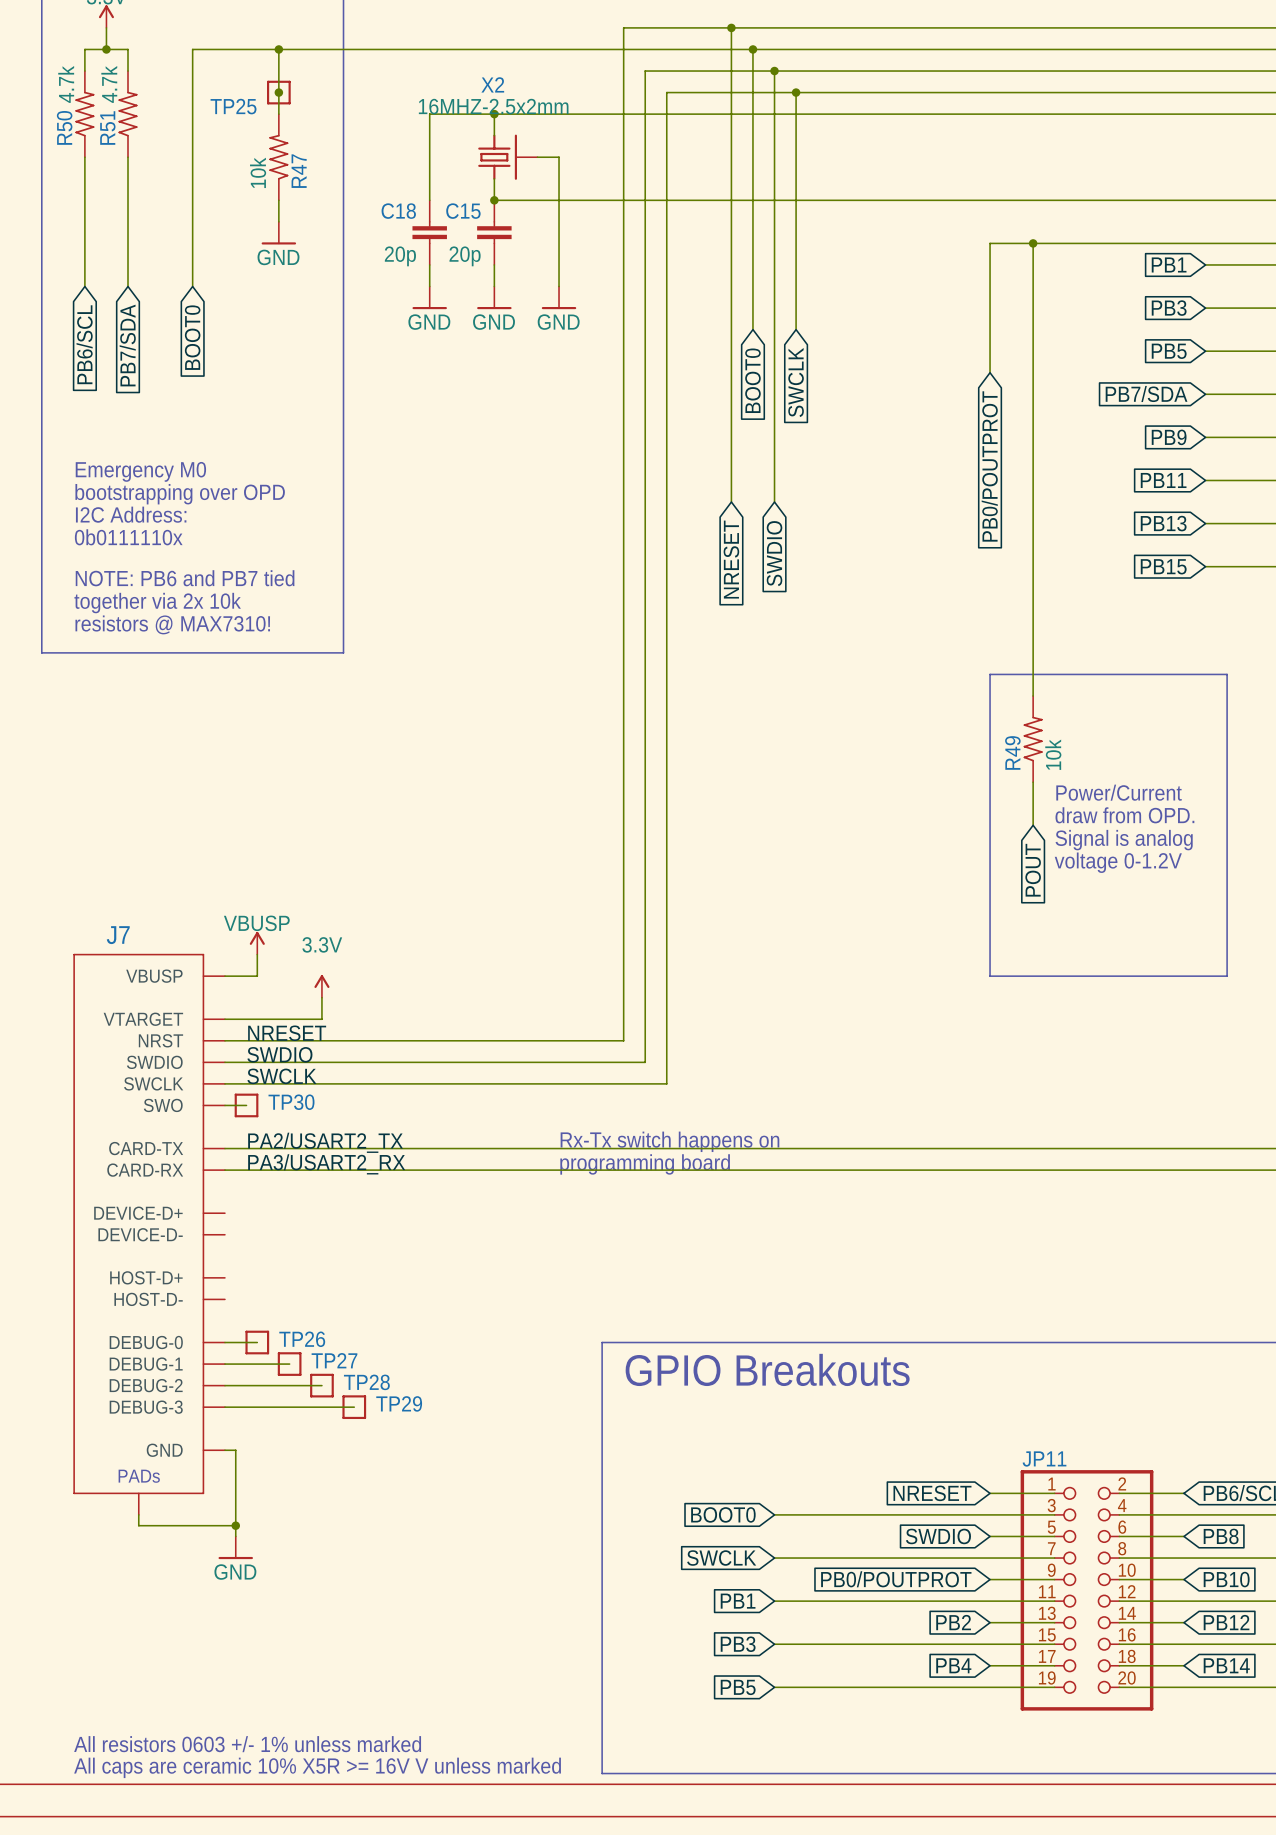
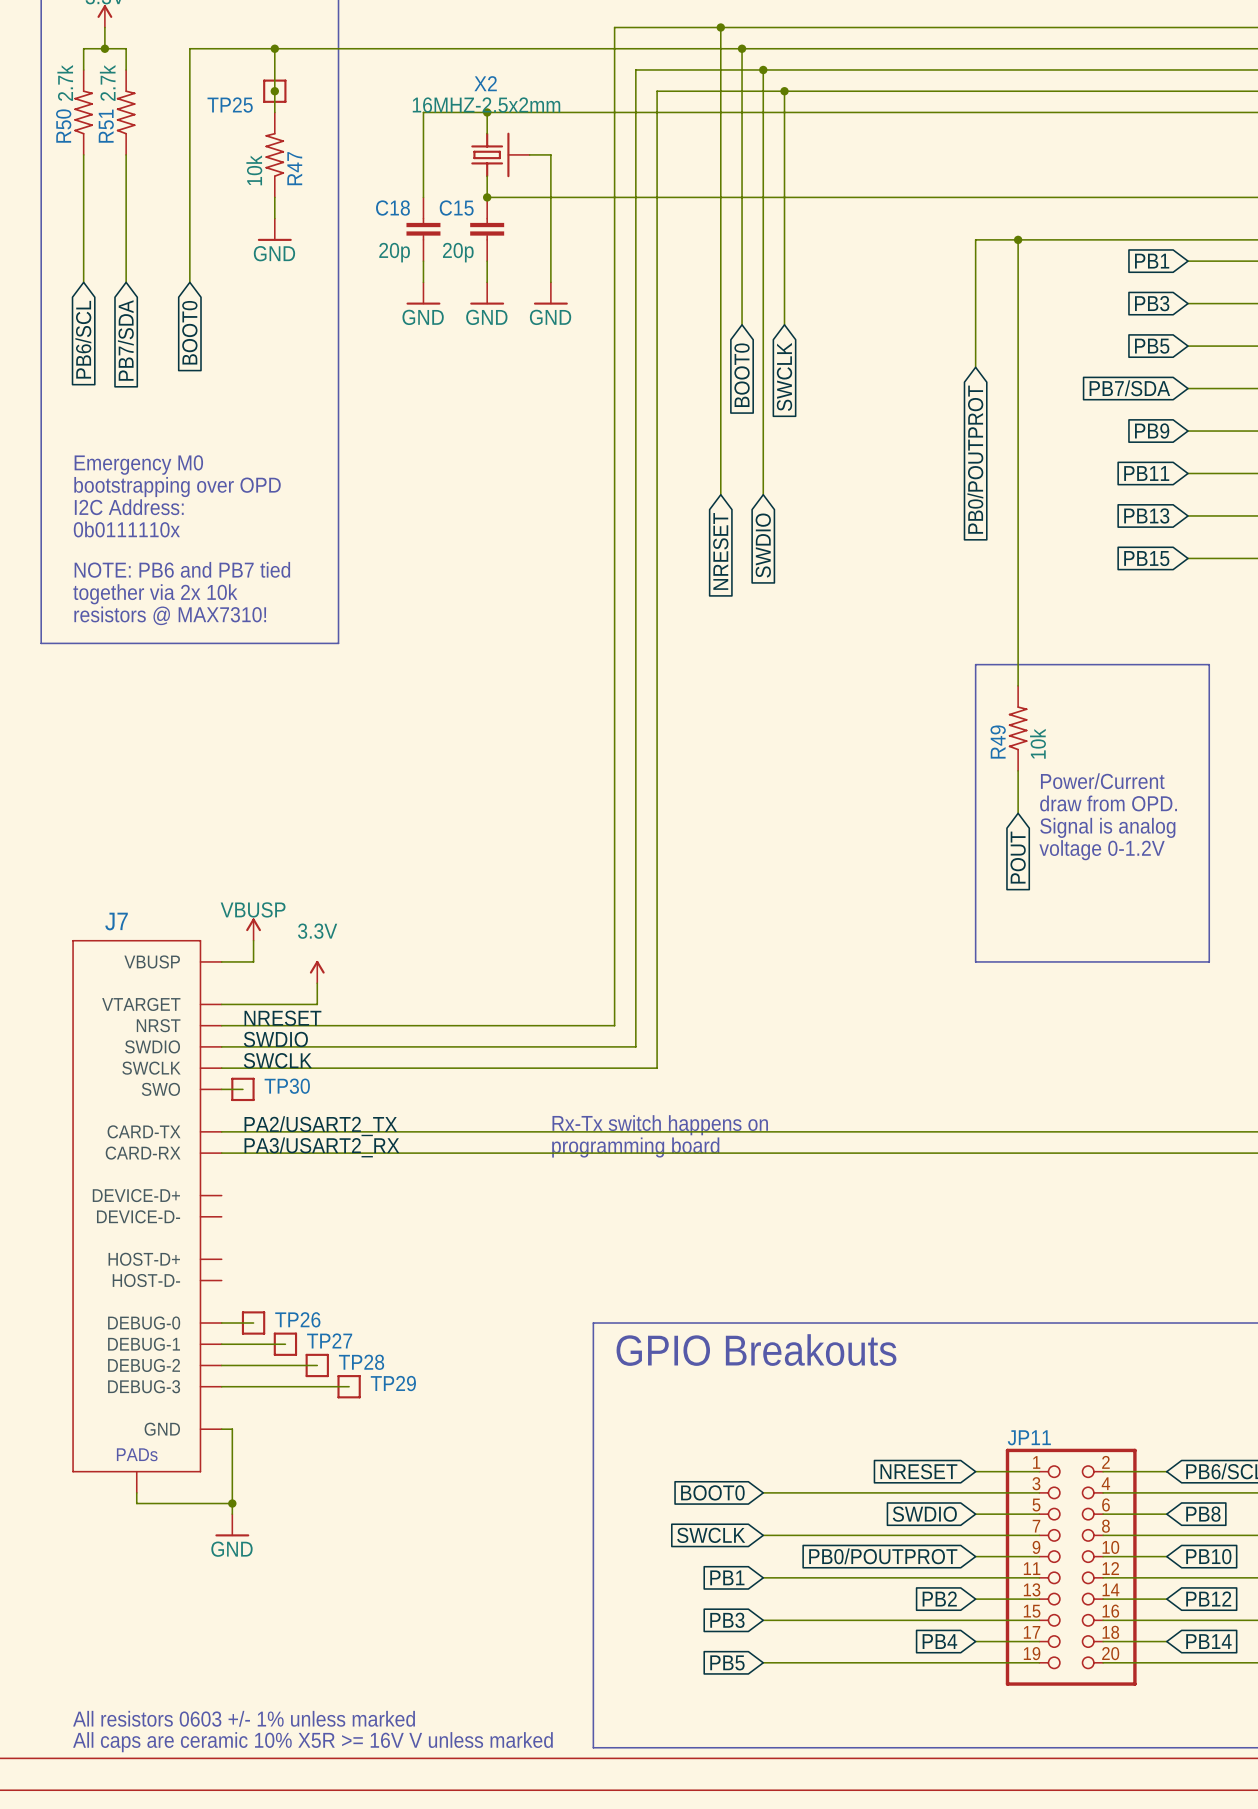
R50 value: 4.7k (66, 84) -> 2.7k (65, 82)
R51 value: 4.7k (109, 84) -> 2.7k (107, 82)

